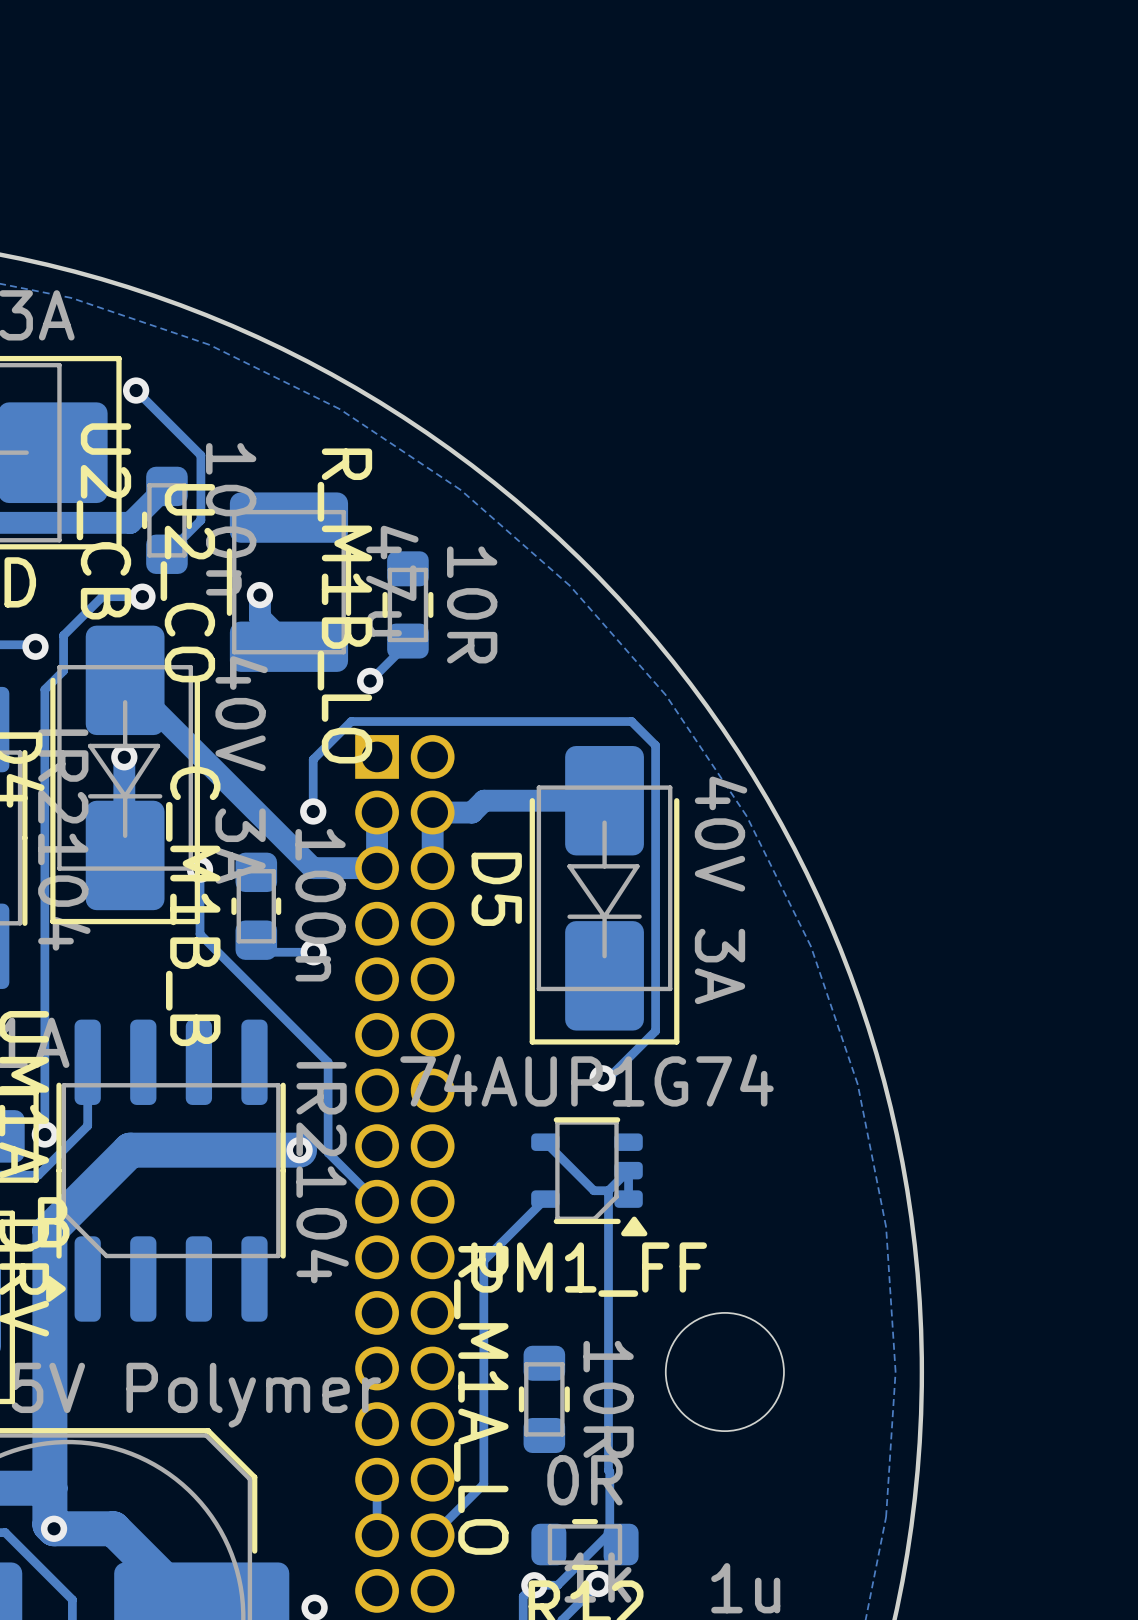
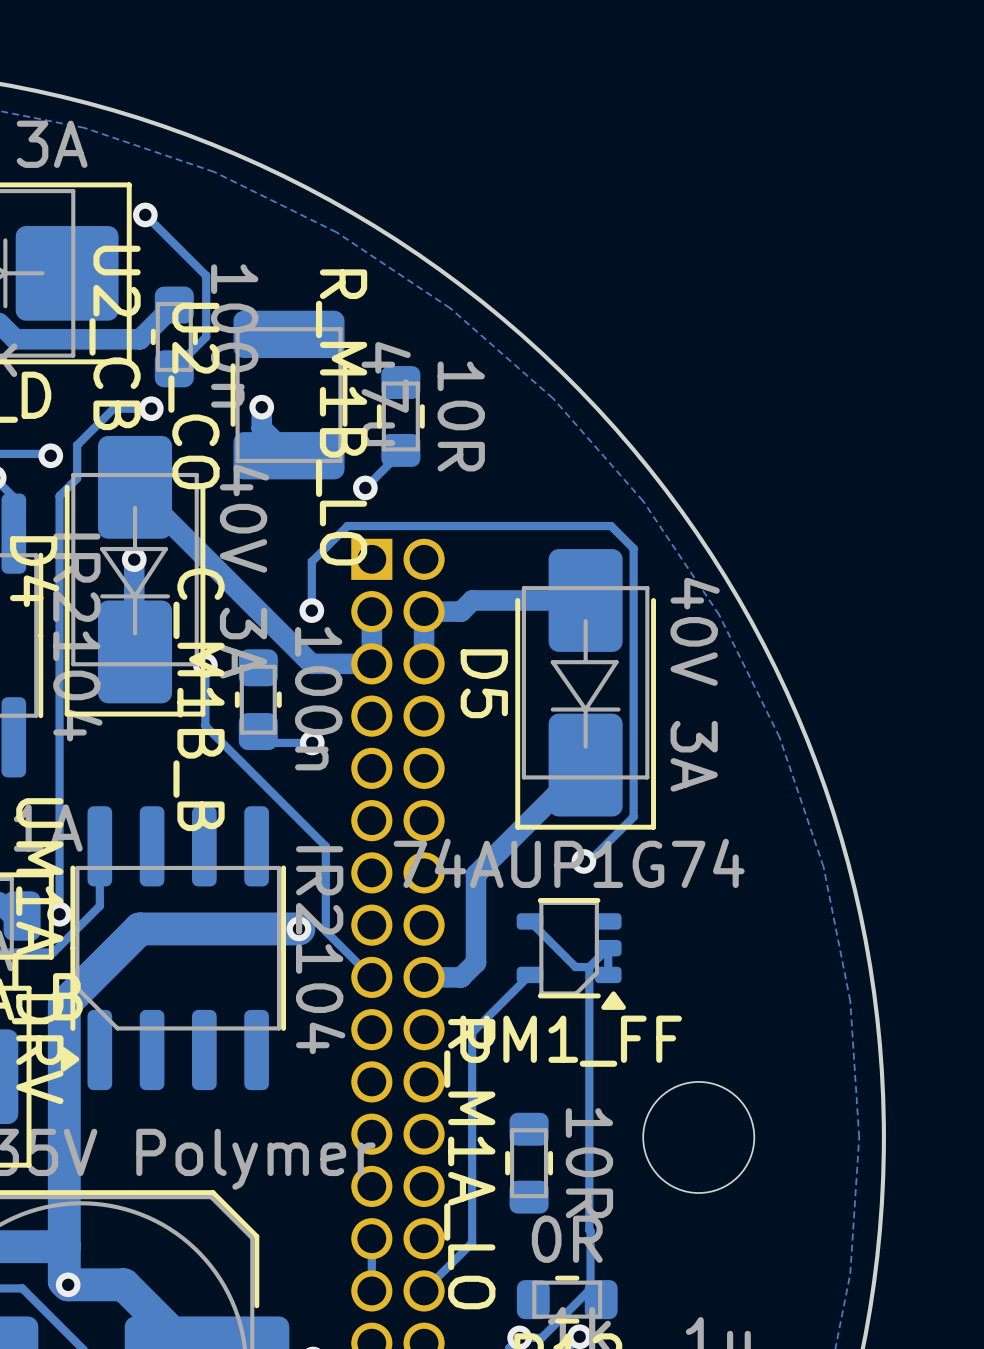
track: none -> (585, 765) (476, 874) (476, 962) (461, 977) (424, 977)

